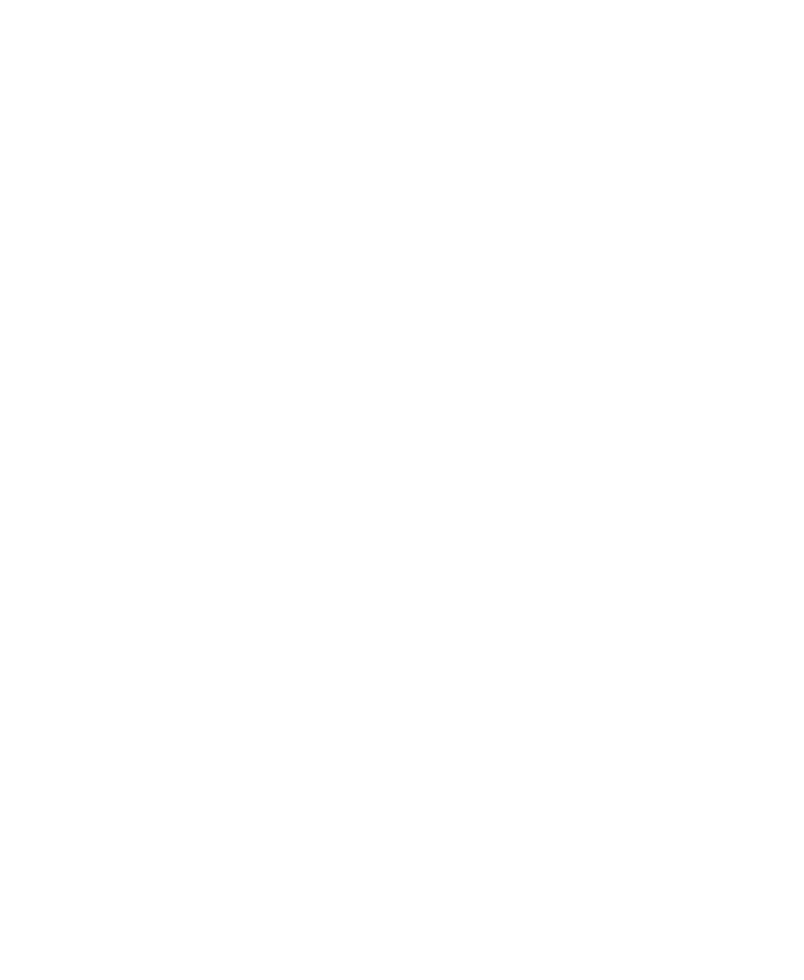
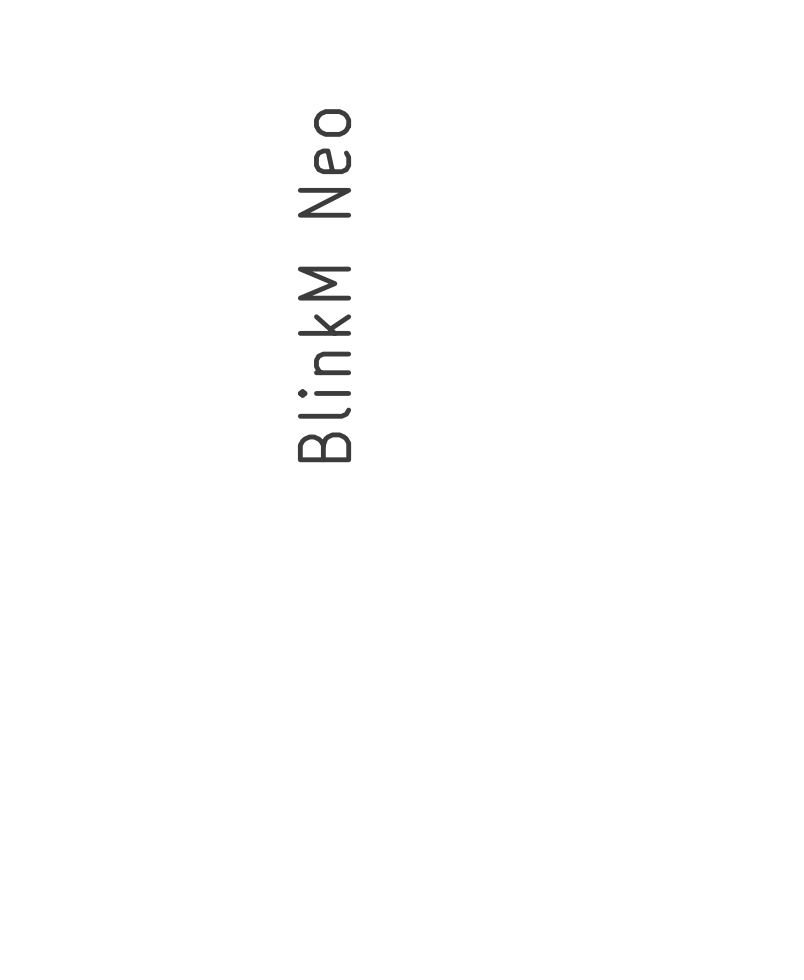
text: none -> BlinkM Neo (324, 285)

